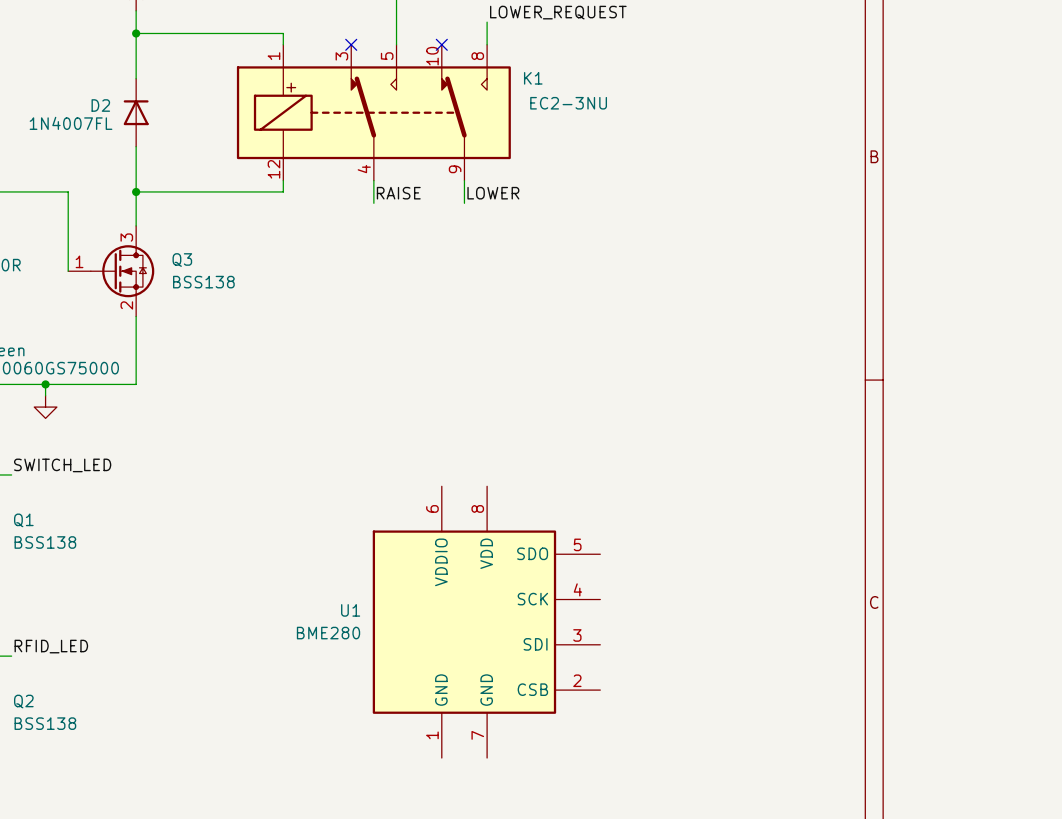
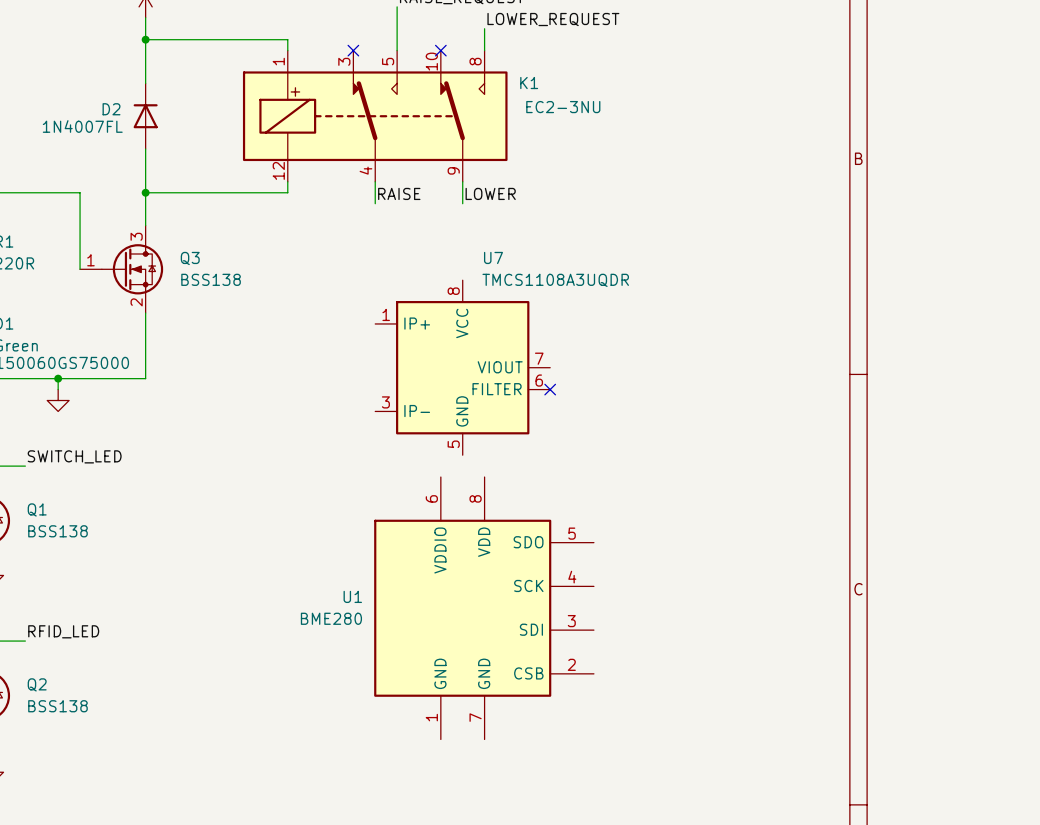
U7: none -> TMCS1108A3UQDR (462, 367)
no-connect mark: none -> (550, 389)

